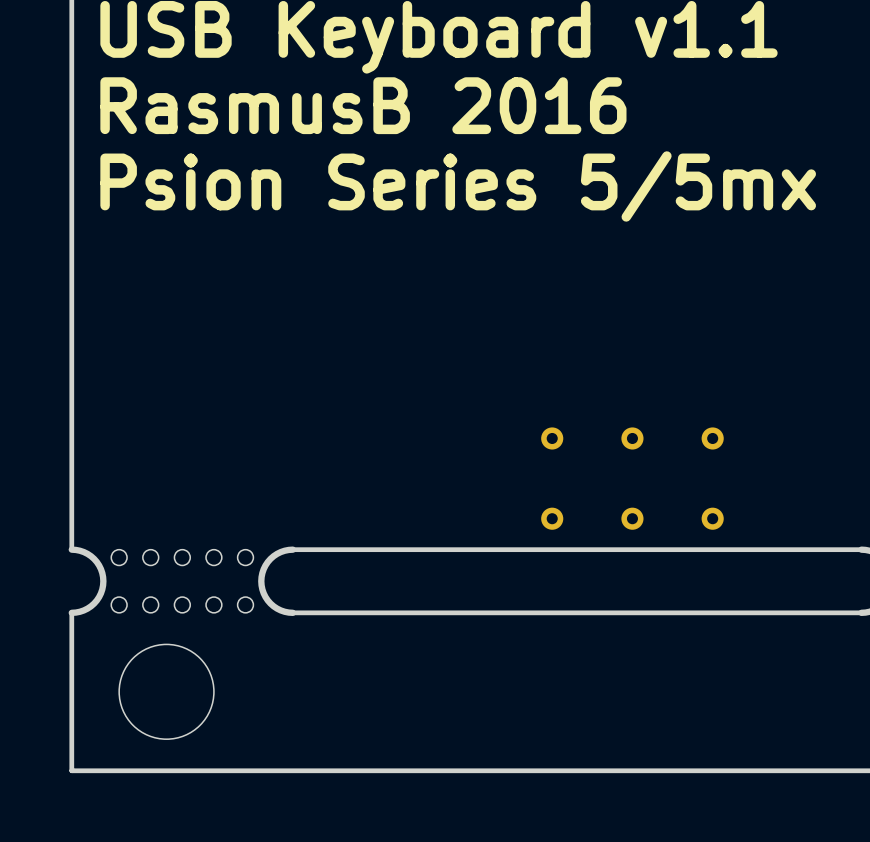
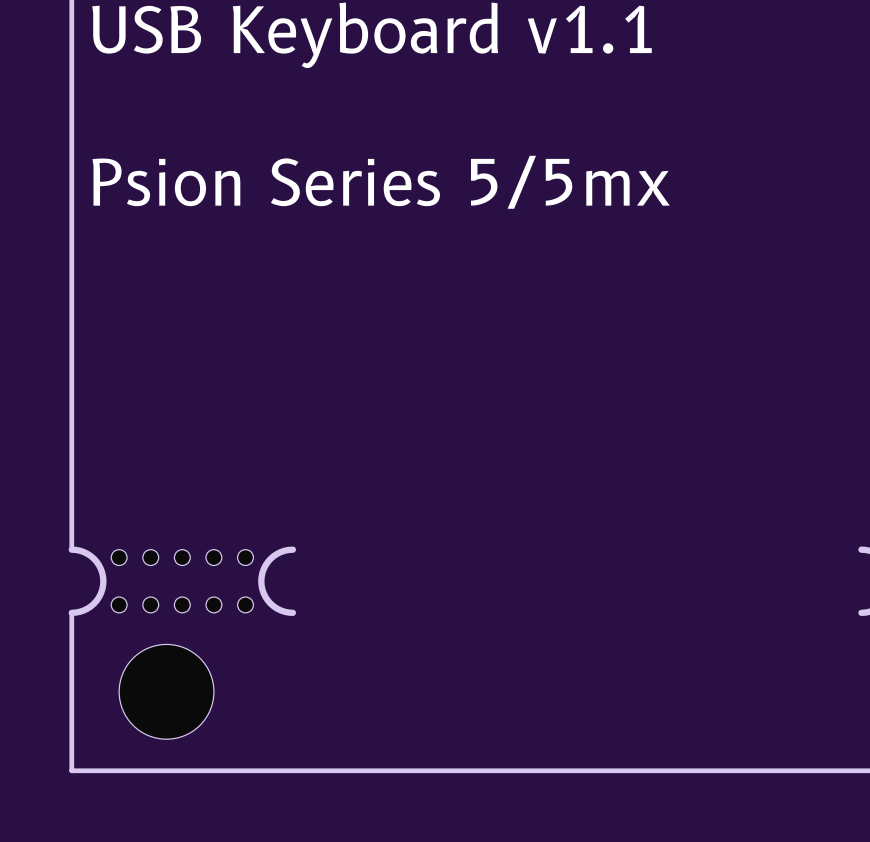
text: RasmusB 2016 (363, 105) -> none
part: (632, 478) -> none
board edge: (861, 549) (292, 549) -> none
board edge: (861, 612) (292, 612) -> none

